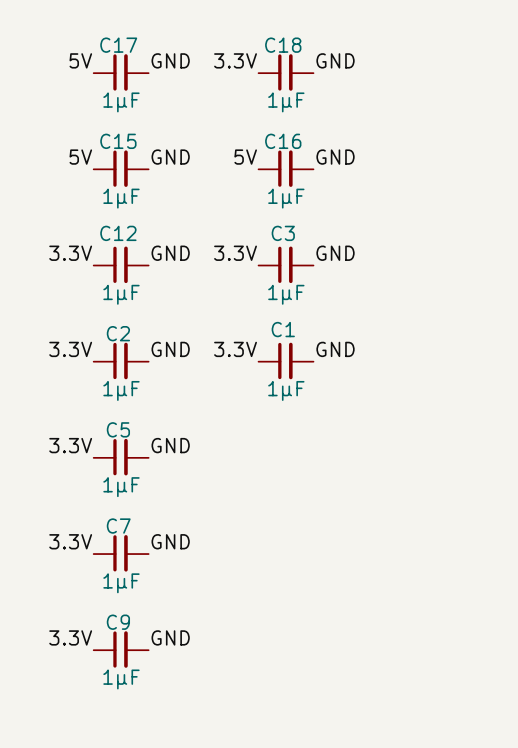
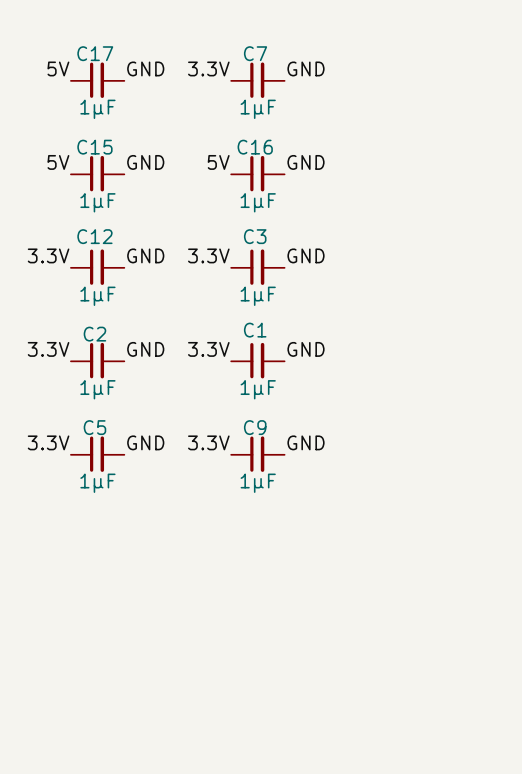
C18 name: C18 (283, 45) -> C7 (255, 53)
label: none -> 3.3V (208, 442)
label: none -> GND (306, 442)
label: 3.3V (70, 541) -> none
label: GND (170, 541) -> none
C7: 1μF (121, 553) -> none
label: 3.3V (70, 637) -> none
label: GND (170, 637) -> none
C9 position: (121, 649) -> (257, 454)

